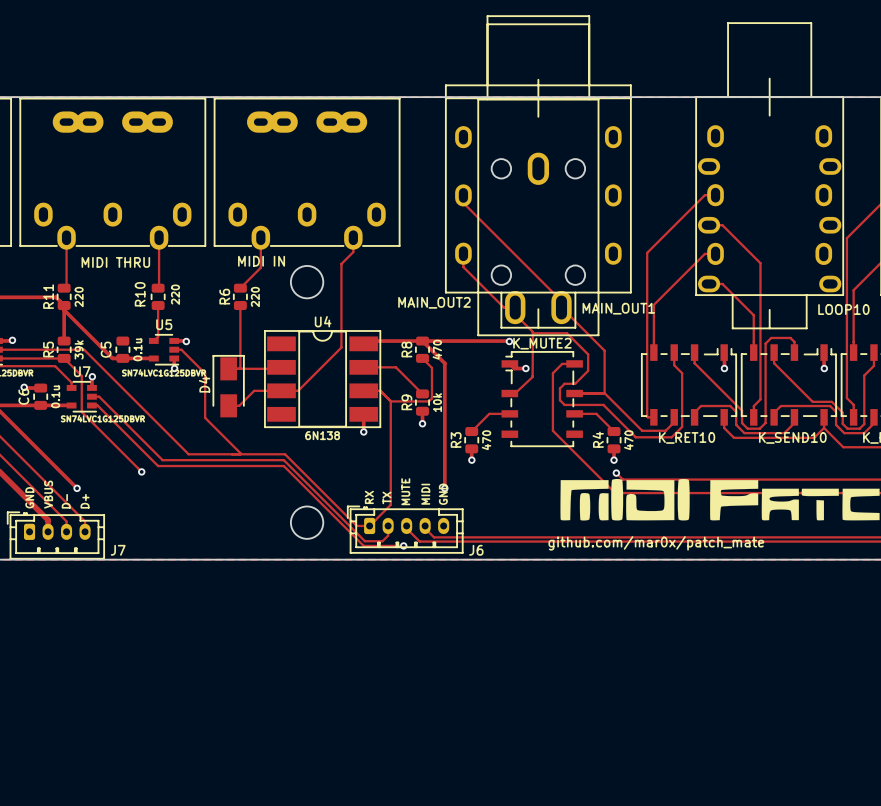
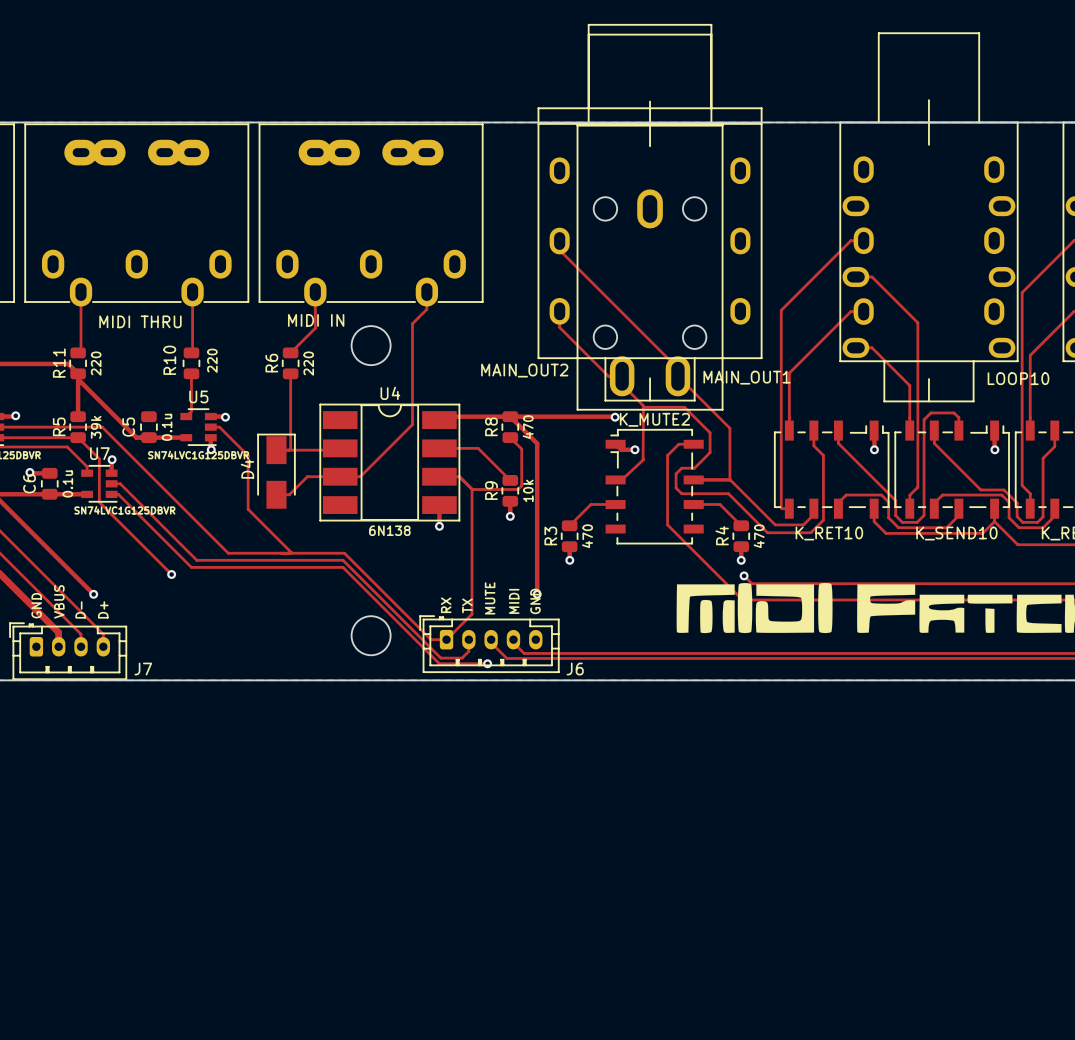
text: github.com/mar0x/patch_mate (656, 543) -> none

